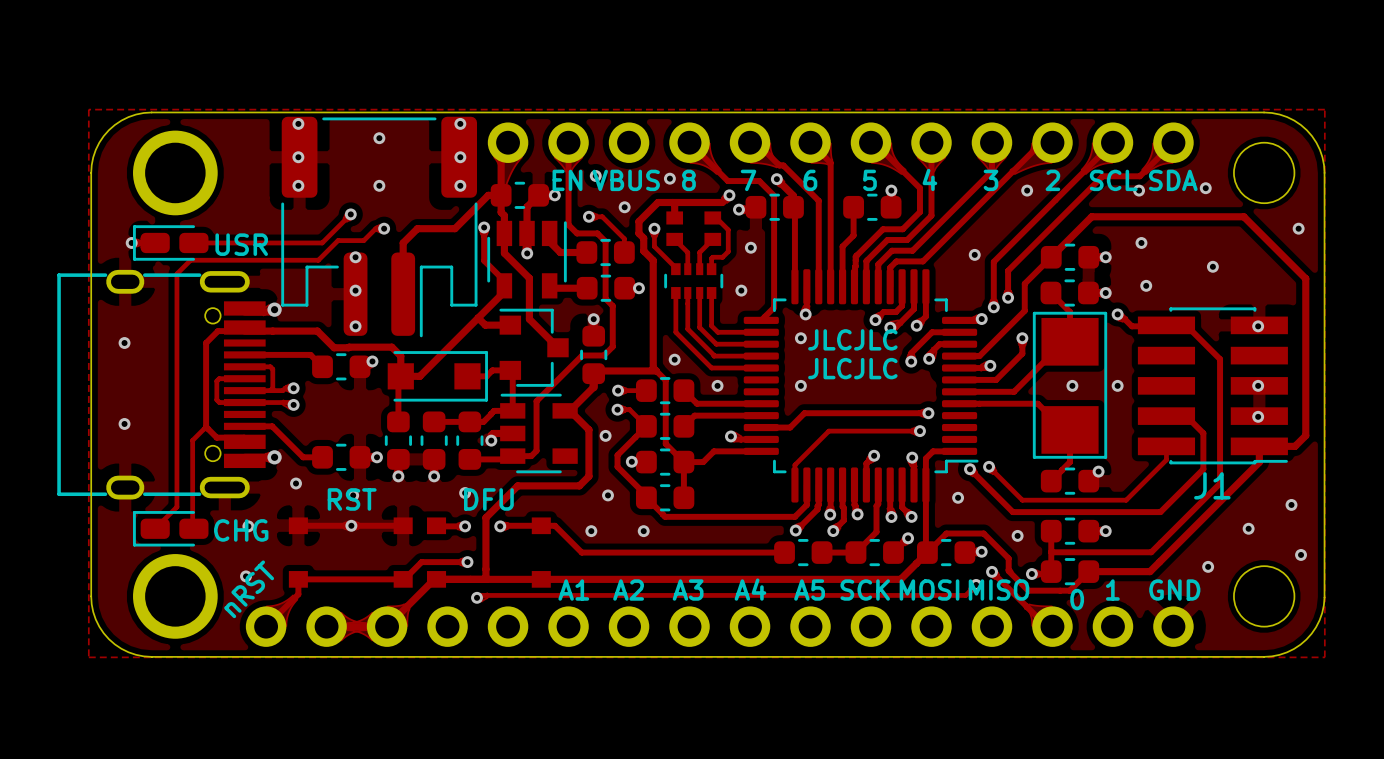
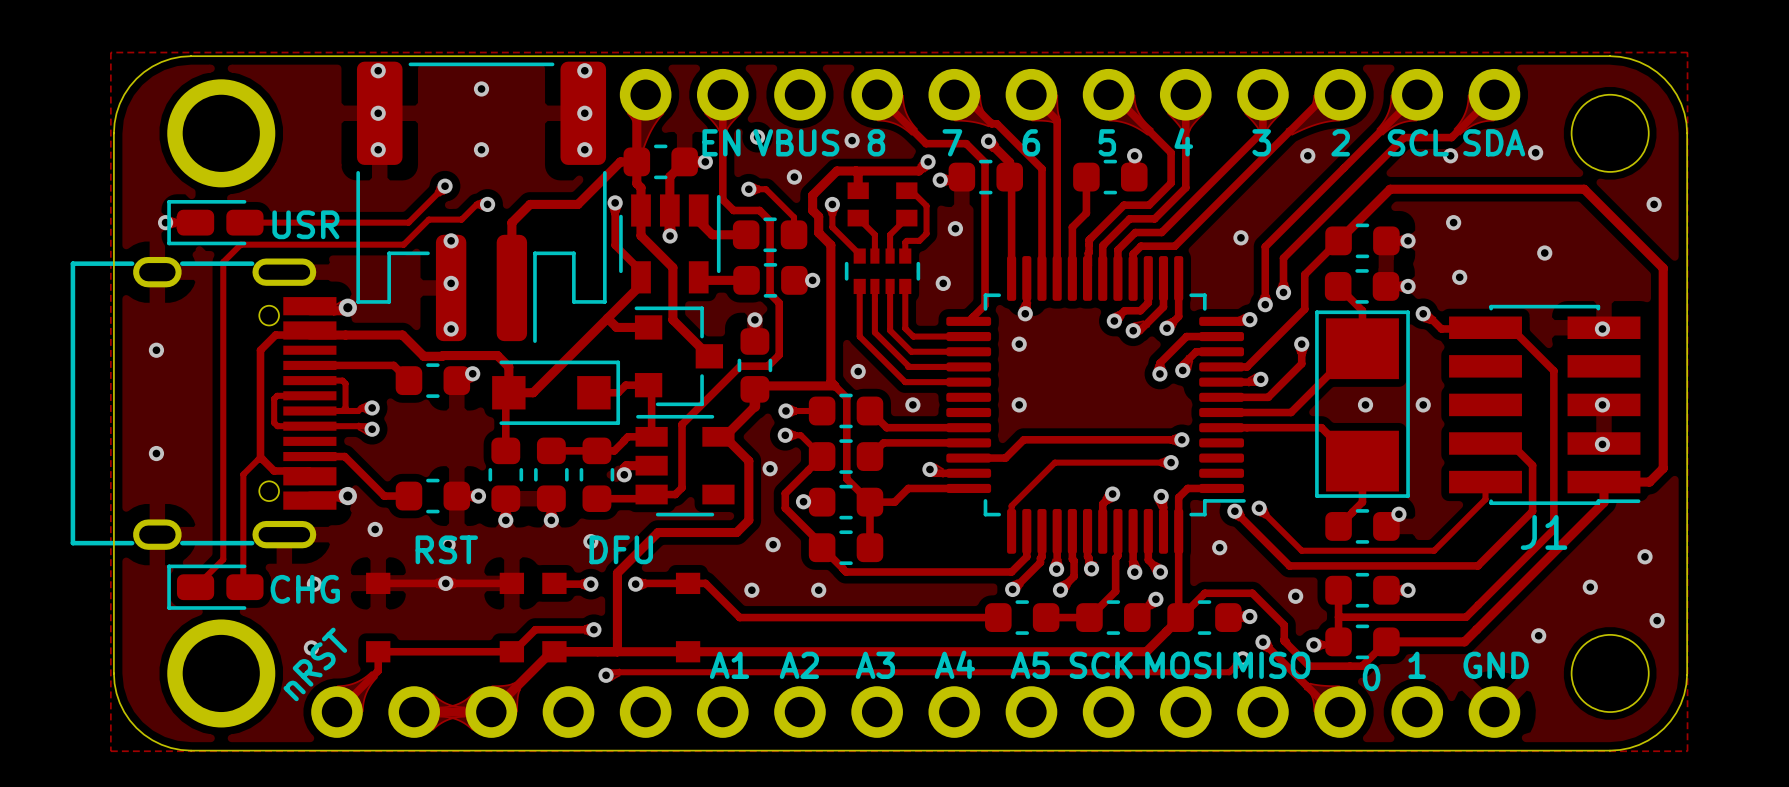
text: JLCJLC (852, 339) -> none
text: JLCJLC (852, 368) -> none

